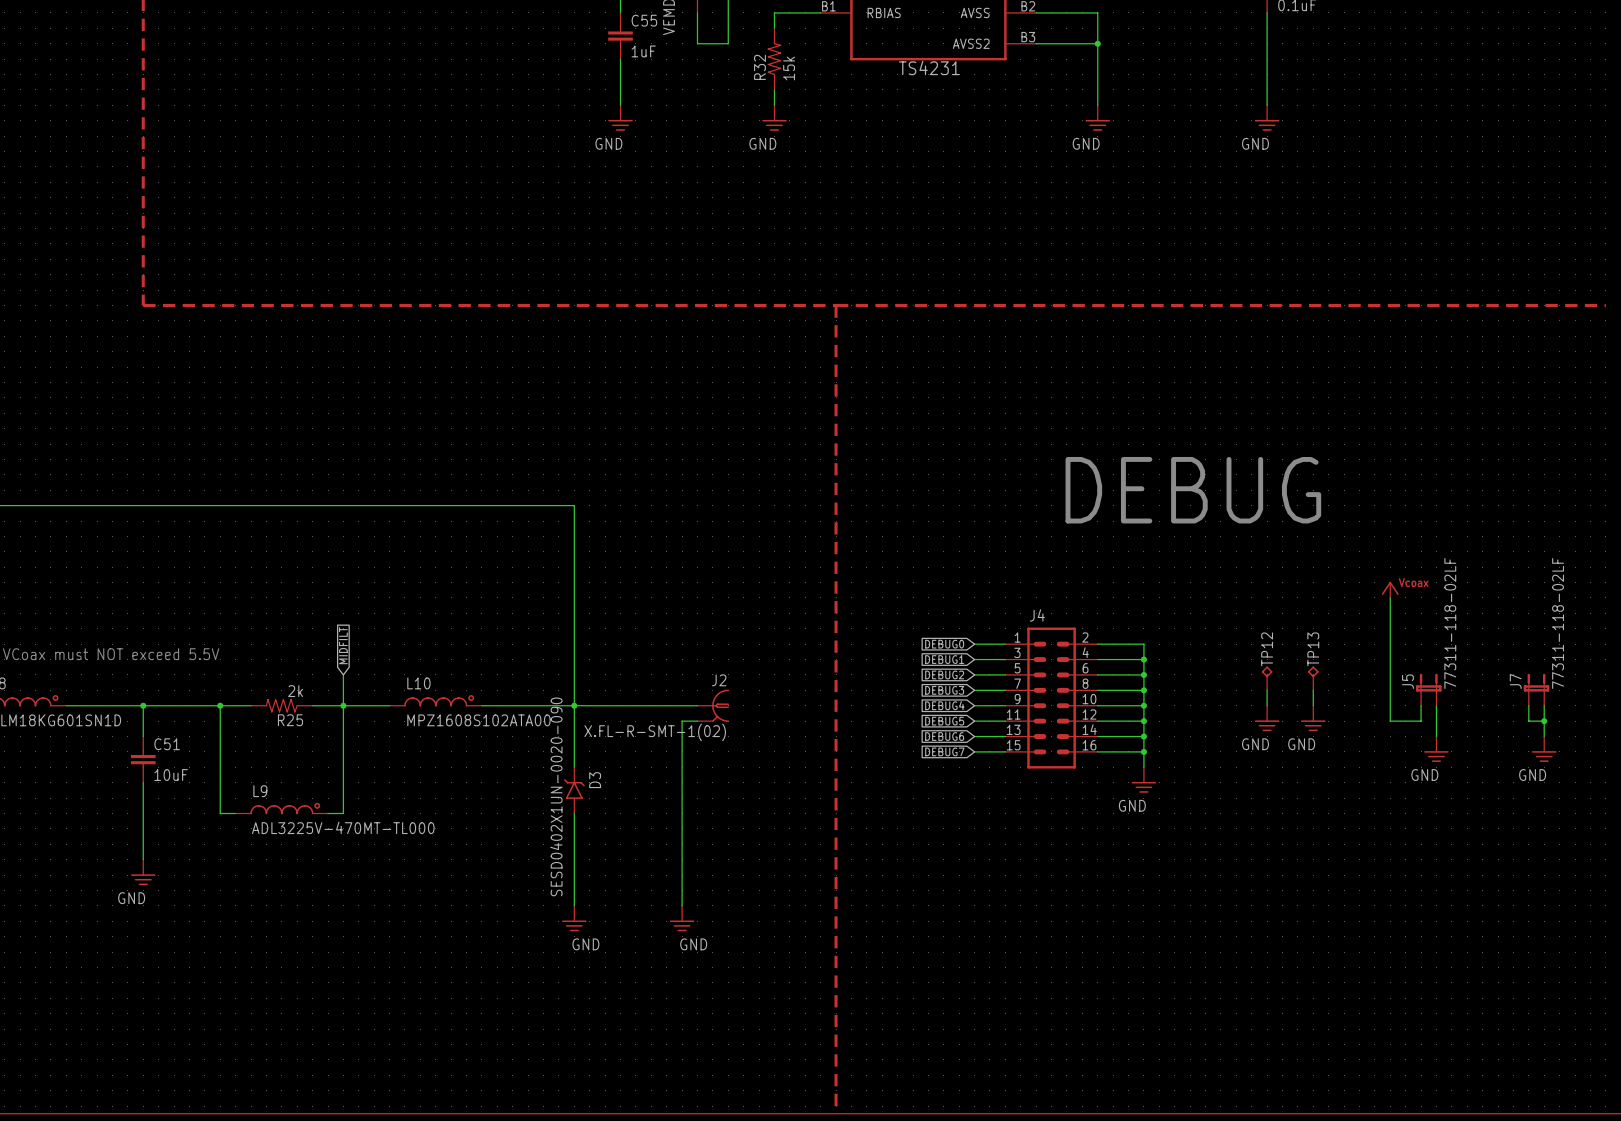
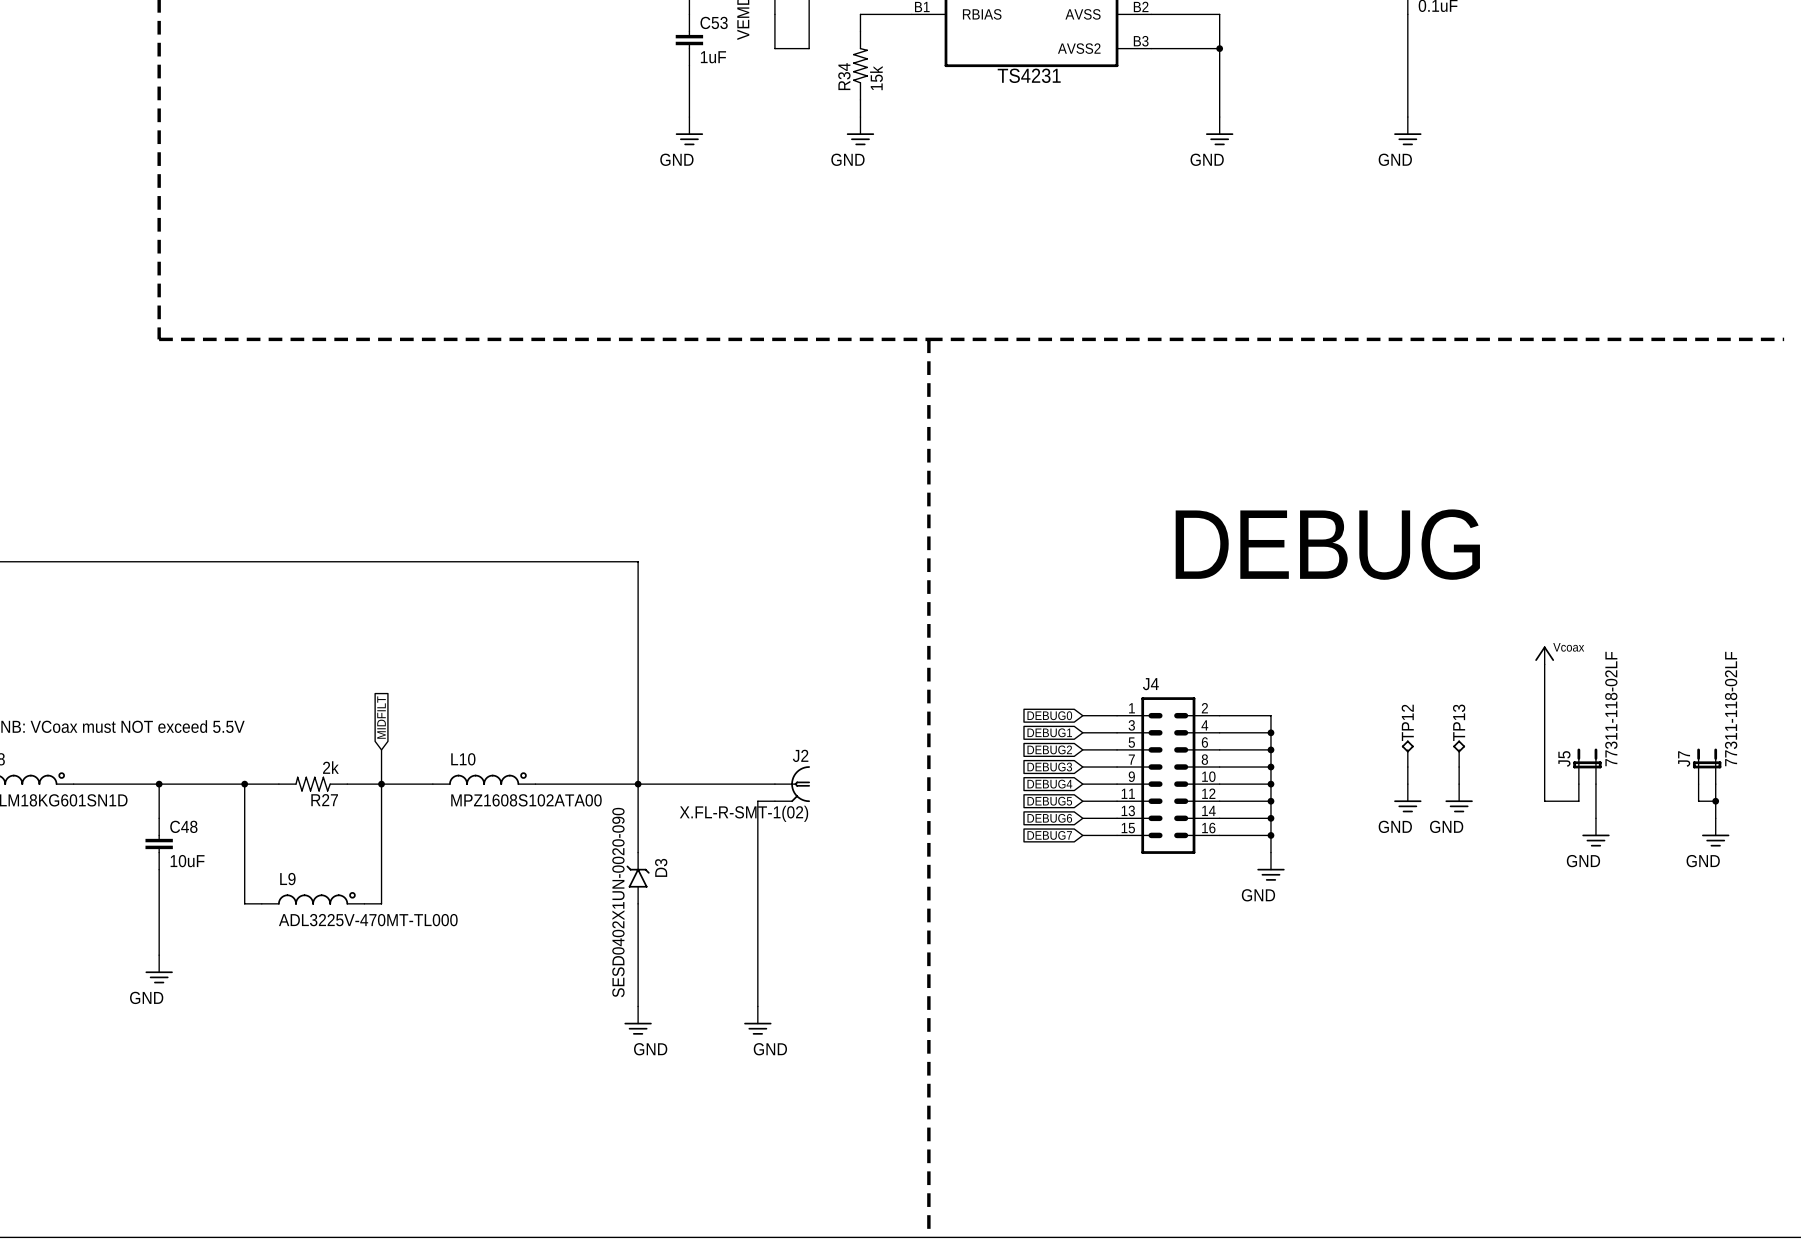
C55 name: C55 (644, 20) -> C53 (714, 22)
R32 name: R32 (759, 67) -> R34 (844, 76)
R25 name: R25 (290, 720) -> R27 (324, 800)
C51 name: C51 (167, 744) -> C48 (183, 826)

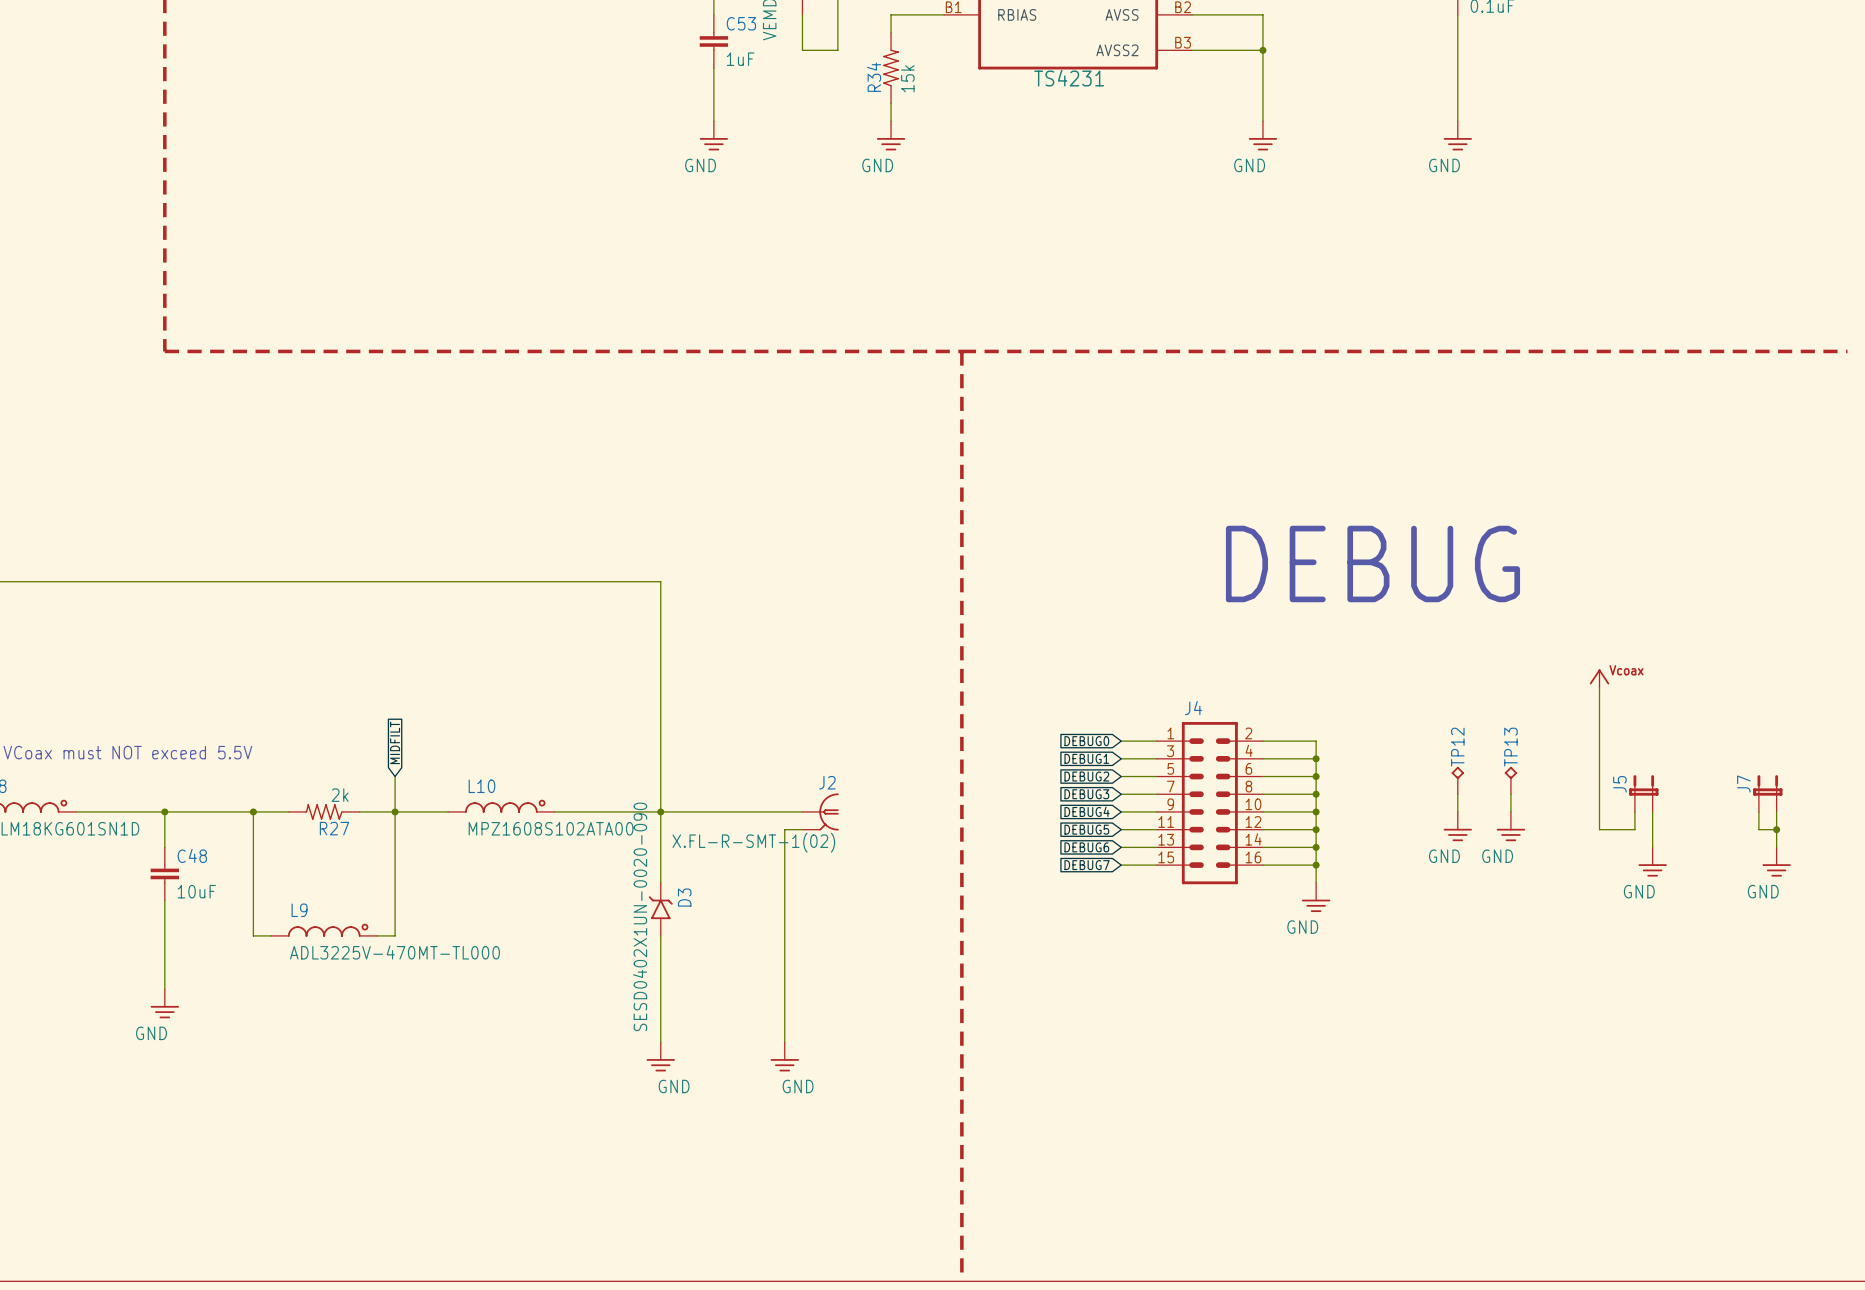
J5 value: 77311-118-02LF (1611, 709) -> none
J7 value: 77311-118-02LF (1731, 709) -> none

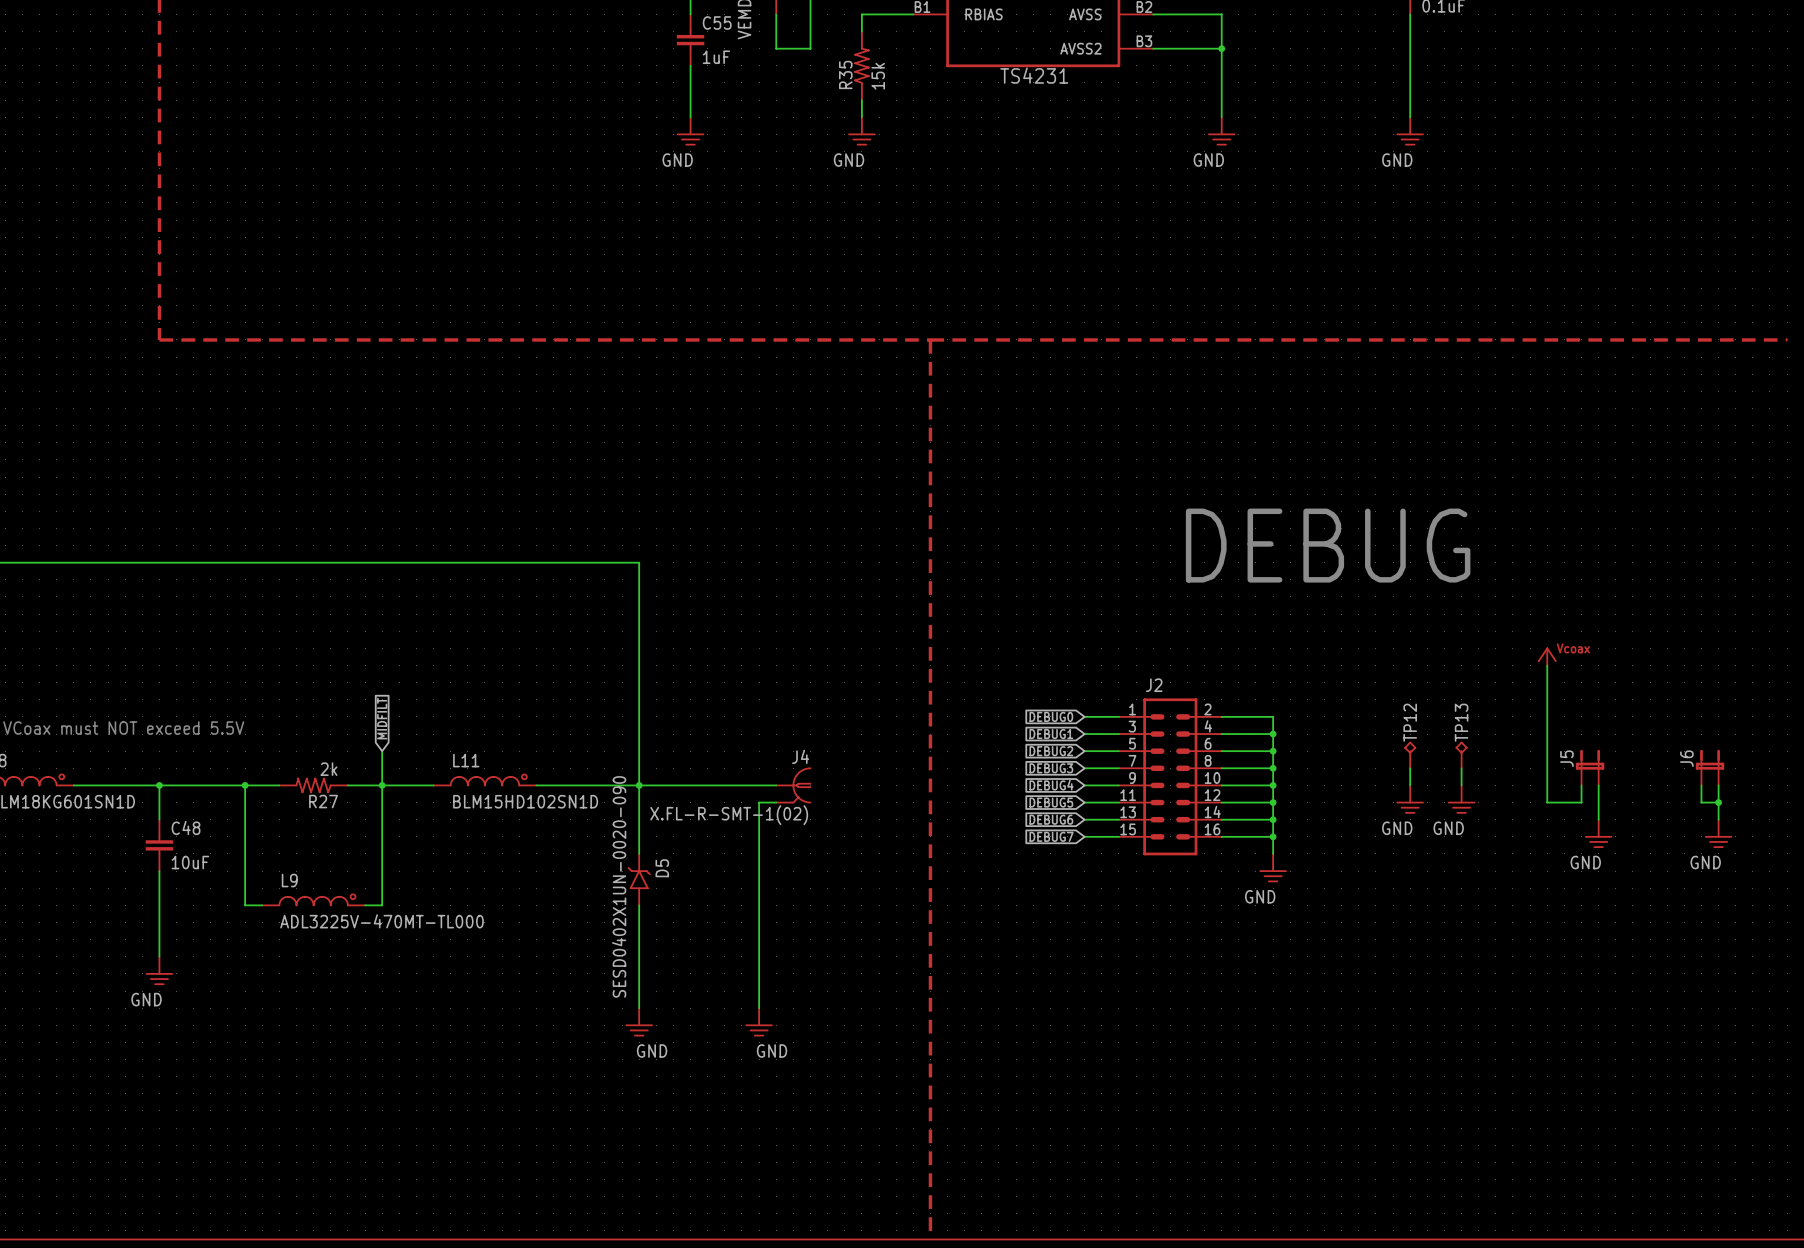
C53 name: C53 (741, 23) -> C55 (717, 22)
R34 name: R34 (874, 77) -> R35 (845, 74)
J4 name: J4 (1193, 708) -> J2 (1154, 685)
J2 name: J2 (827, 782) -> J4 (800, 756)
J7 name: J7 (1743, 784) -> J6 (1686, 758)
L10 name: L10 (481, 786) -> L11 (466, 760)
L10 value: MPZ1608S102ATA00 (551, 828) -> BLM15HD102SN1D (525, 801)
D3 name: D3 (684, 897) -> D5 (662, 868)

